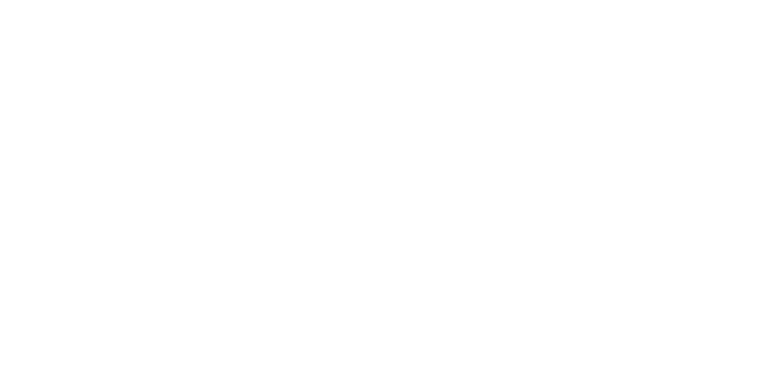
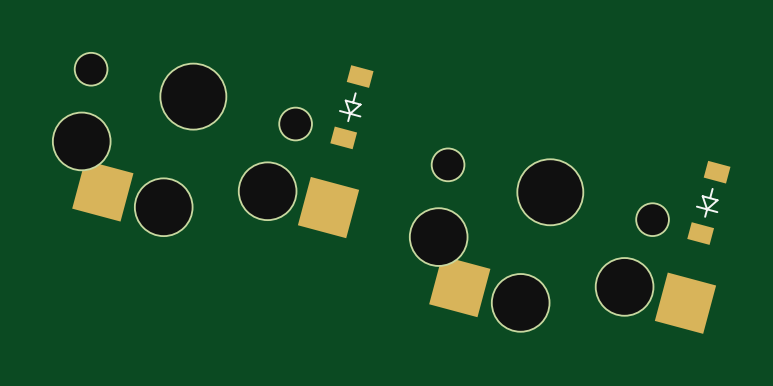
part: none -> (351, 107)
part: none -> (206, 145)
part: none -> (708, 202)
part: none -> (562, 241)

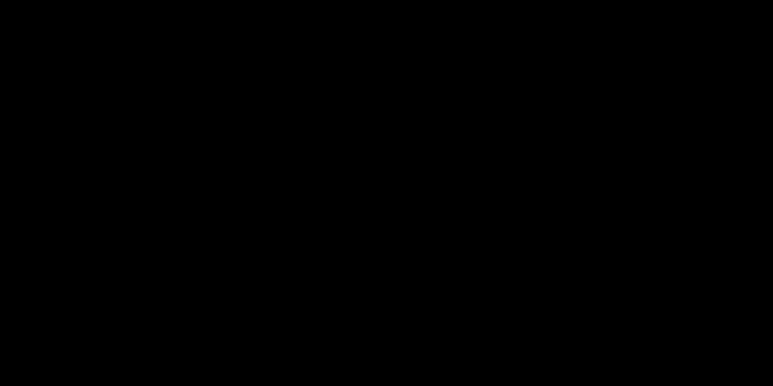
part: (351, 107) -> none
part: (206, 145) -> none
part: (708, 202) -> none
part: (562, 241) -> none

